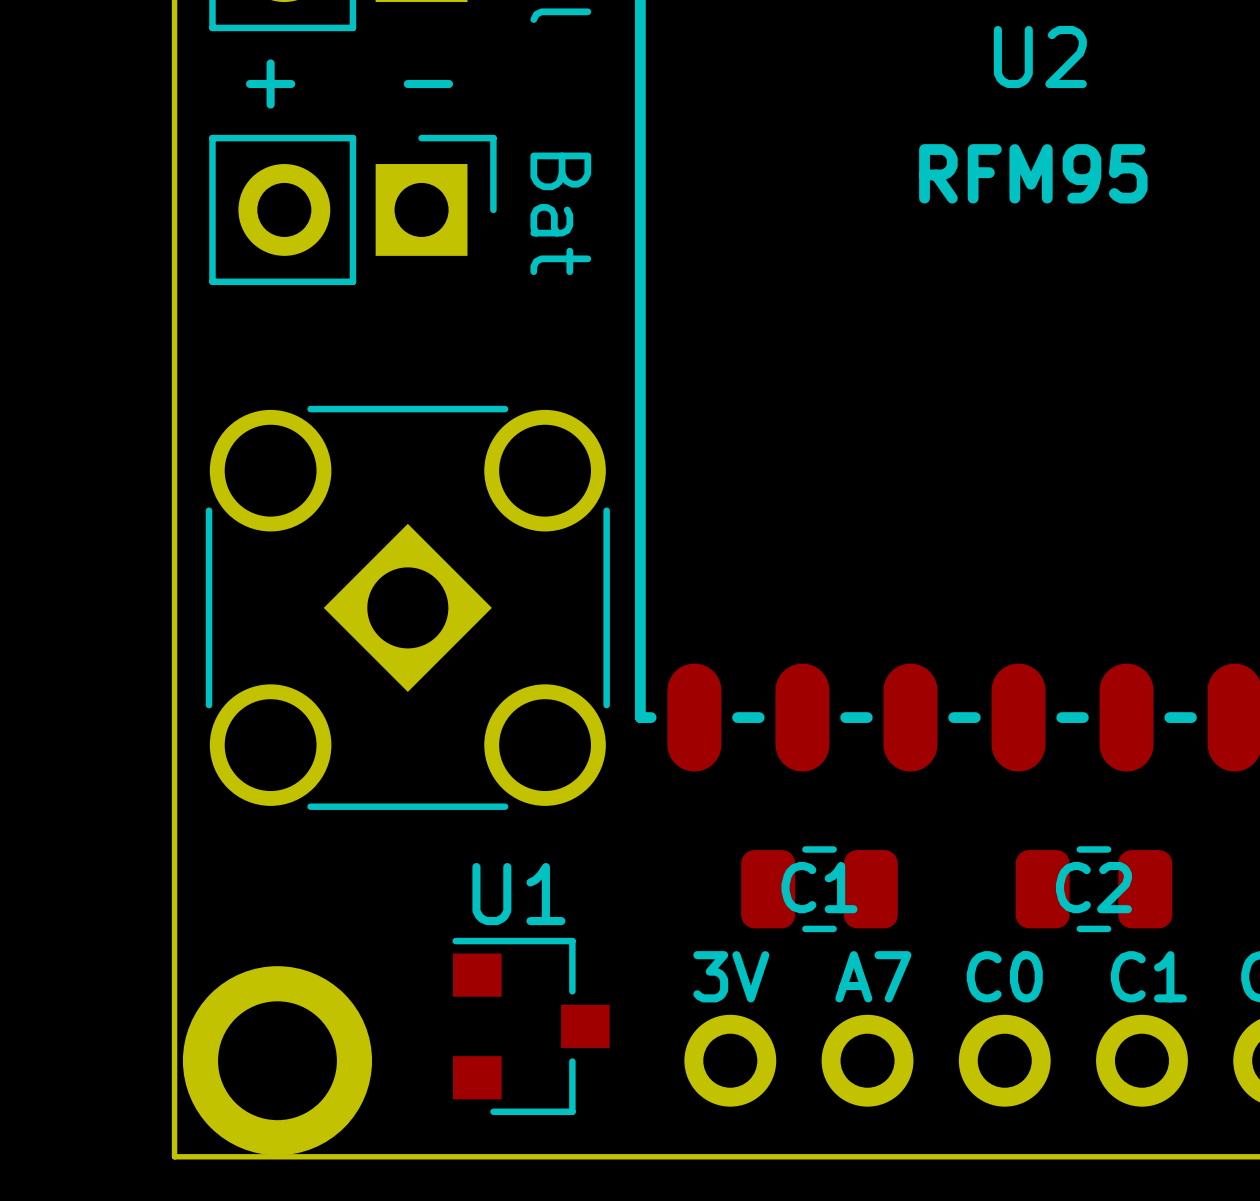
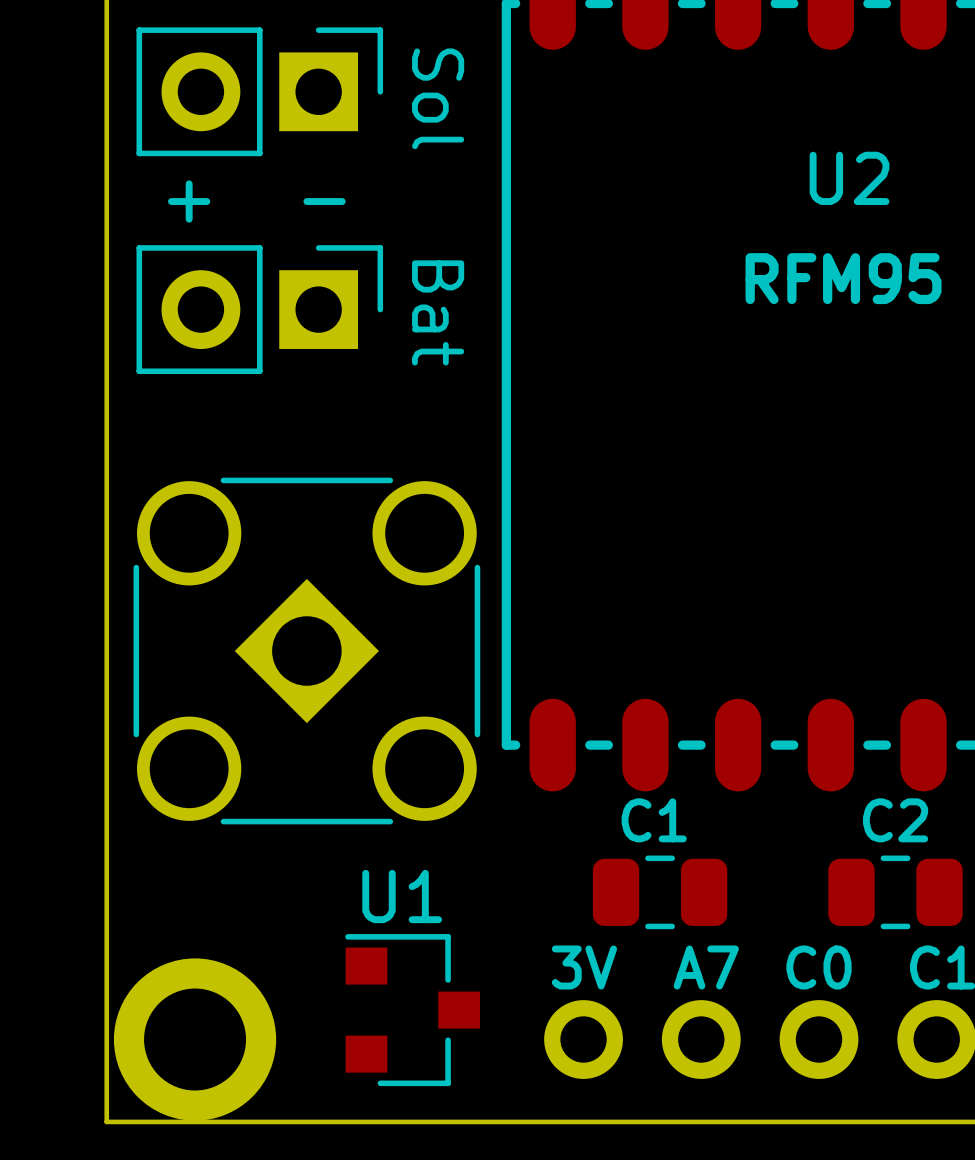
C1 name position: C1 (819, 887) -> C1 (654, 820)
C2 name position: C2 (1093, 887) -> C2 (895, 820)

